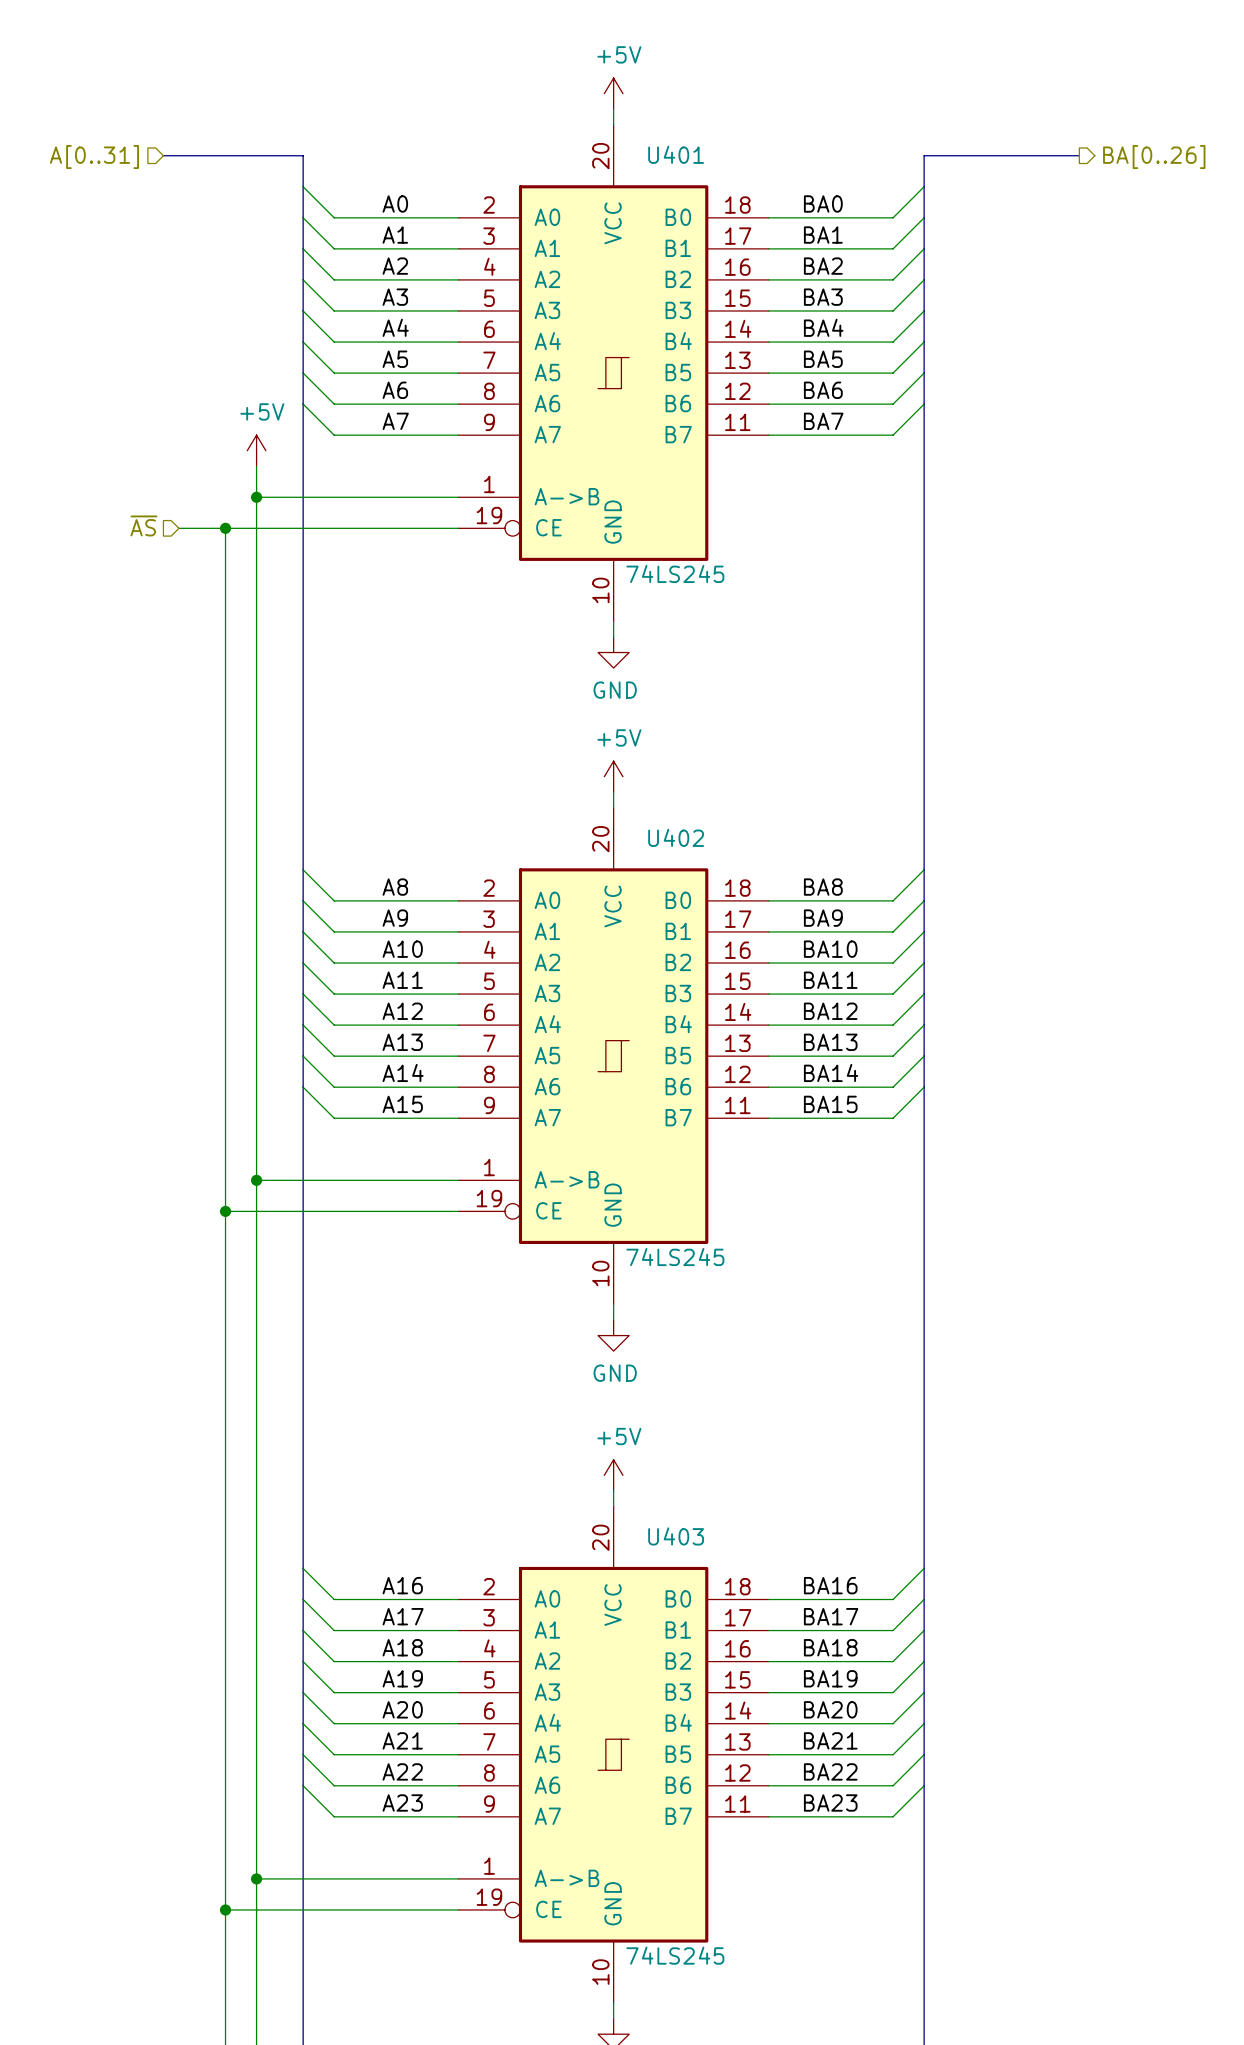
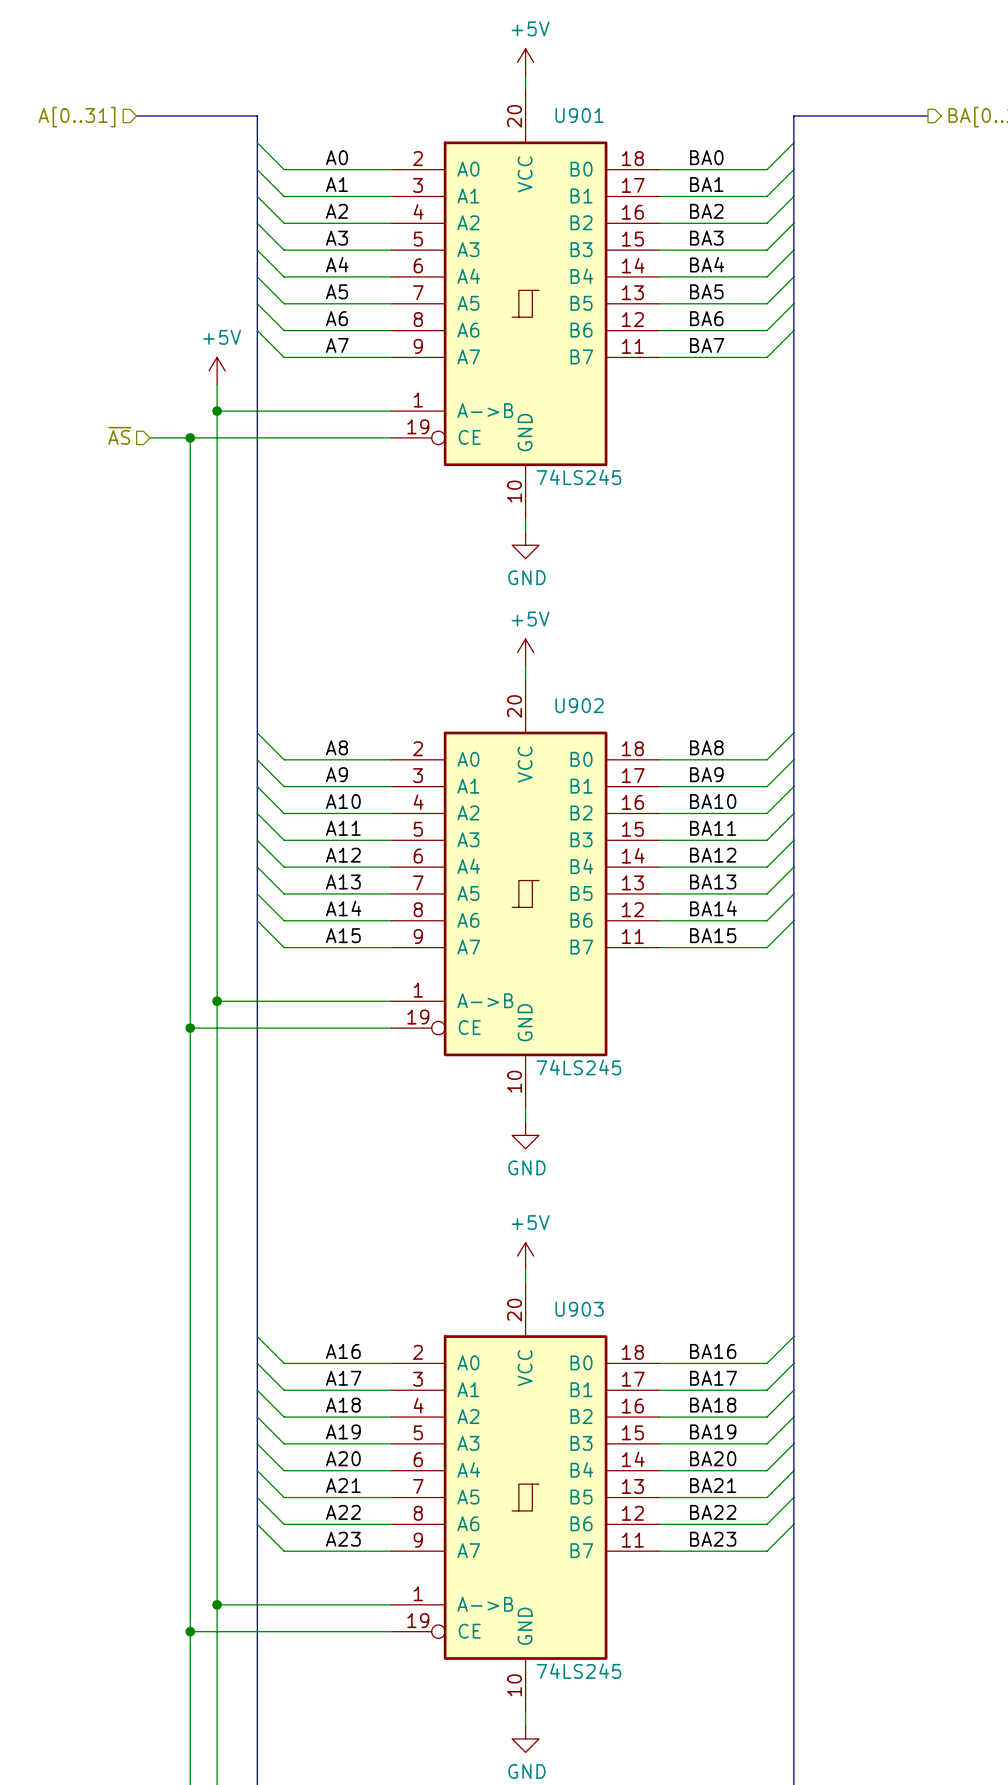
U401 name: U401 (676, 154) -> U901 (579, 115)
U402 name: U402 (676, 837) -> U902 (579, 705)
U403 name: U403 (676, 1536) -> U903 (579, 1309)

